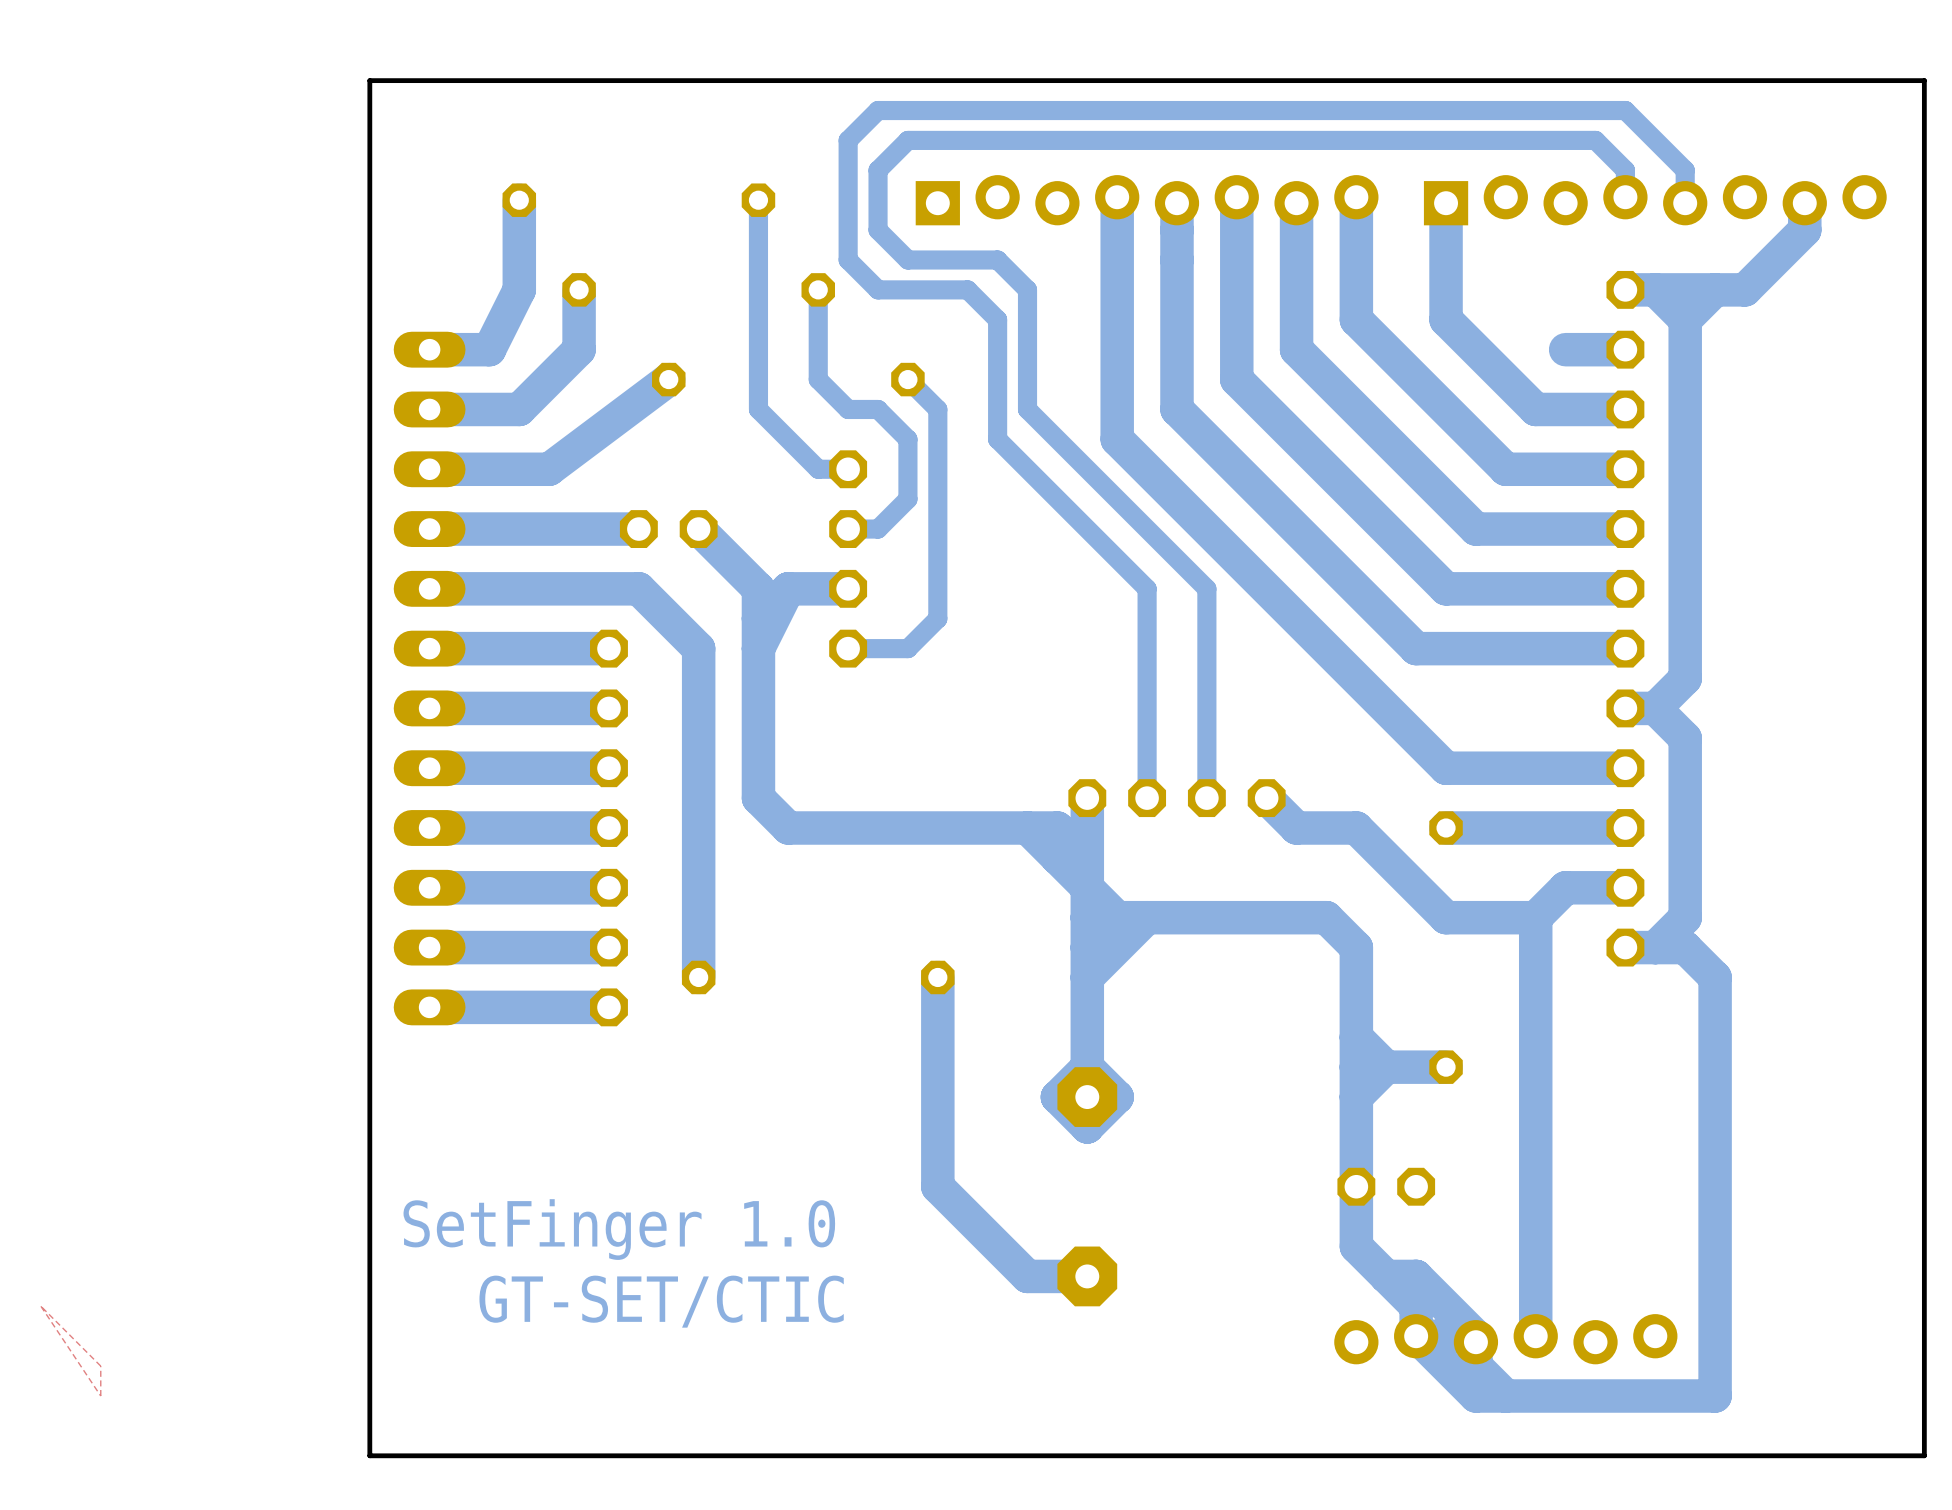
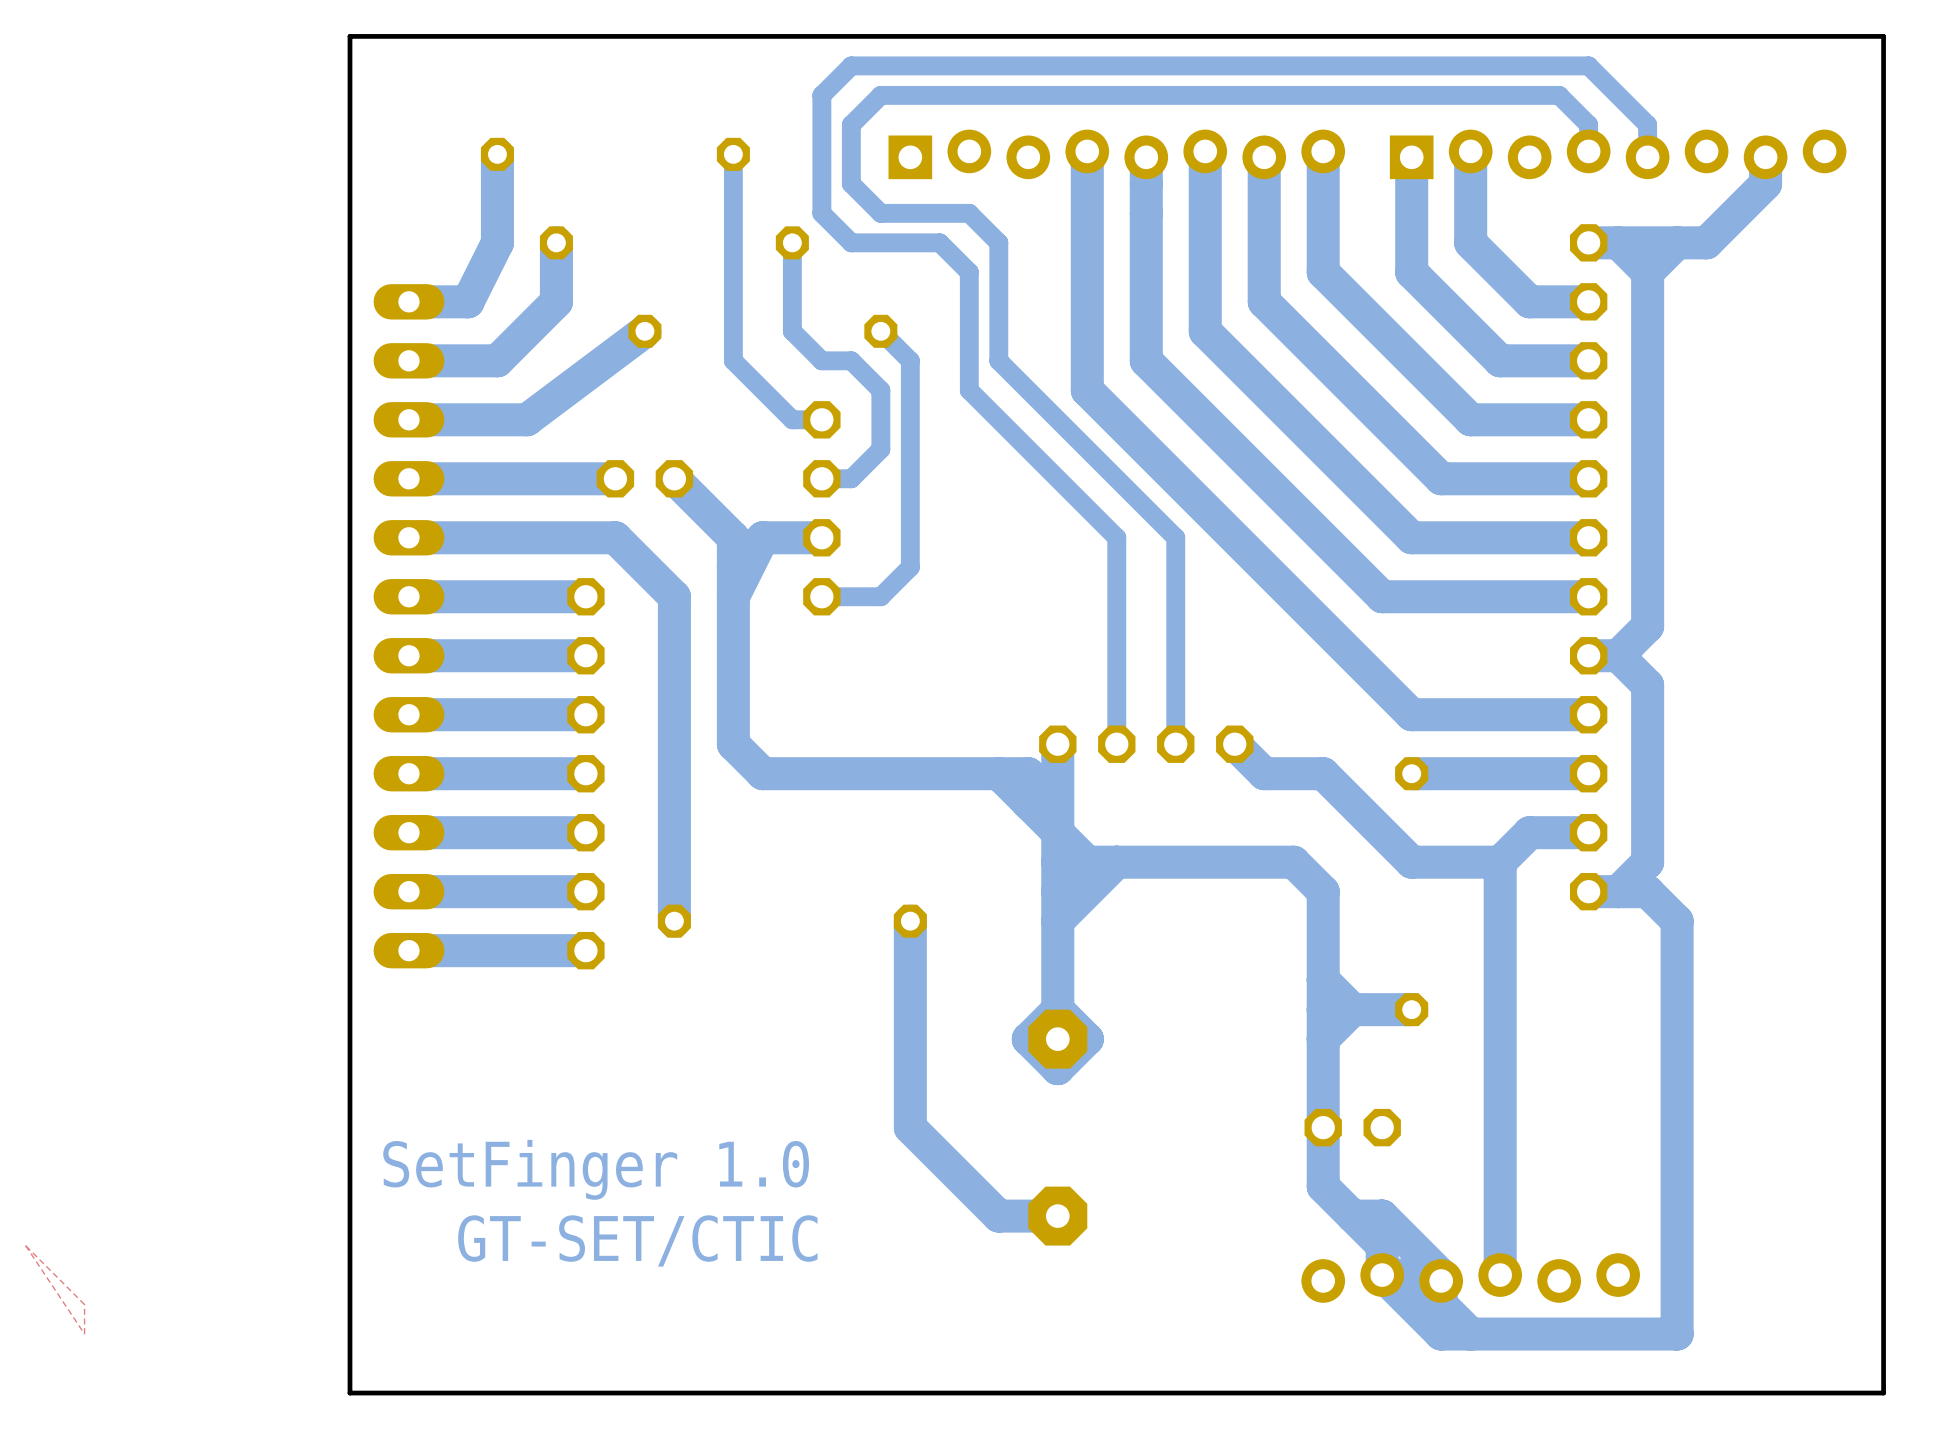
bottom track: none -> (1470, 154) (1470, 242) (1529, 301)

